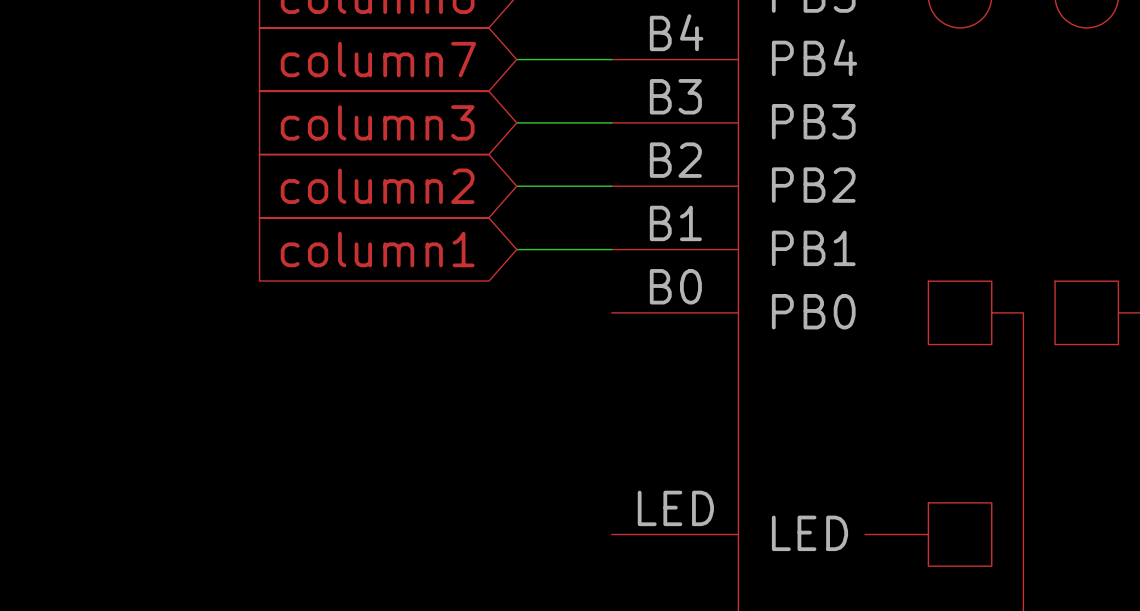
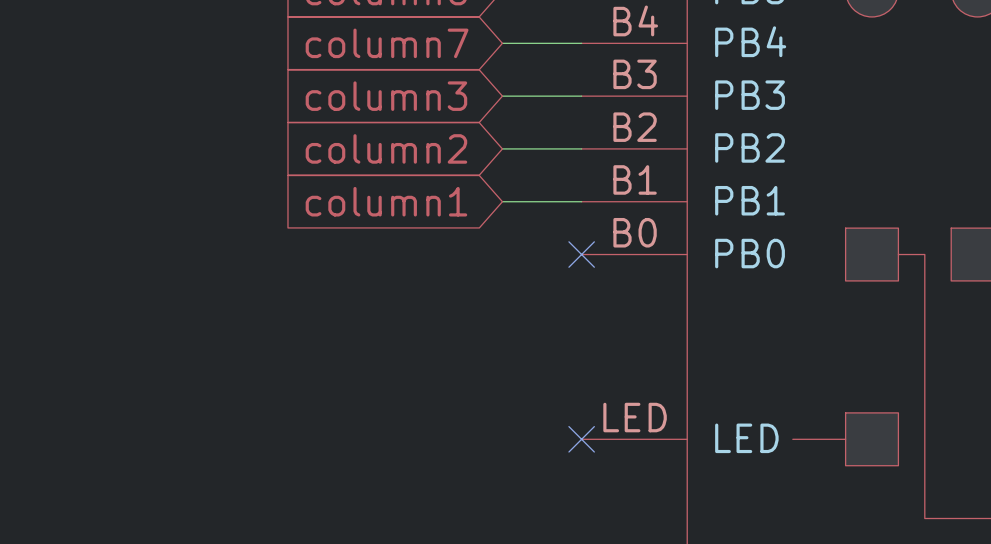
no-connect mark: none -> (581, 254)
no-connect mark: none -> (581, 439)

